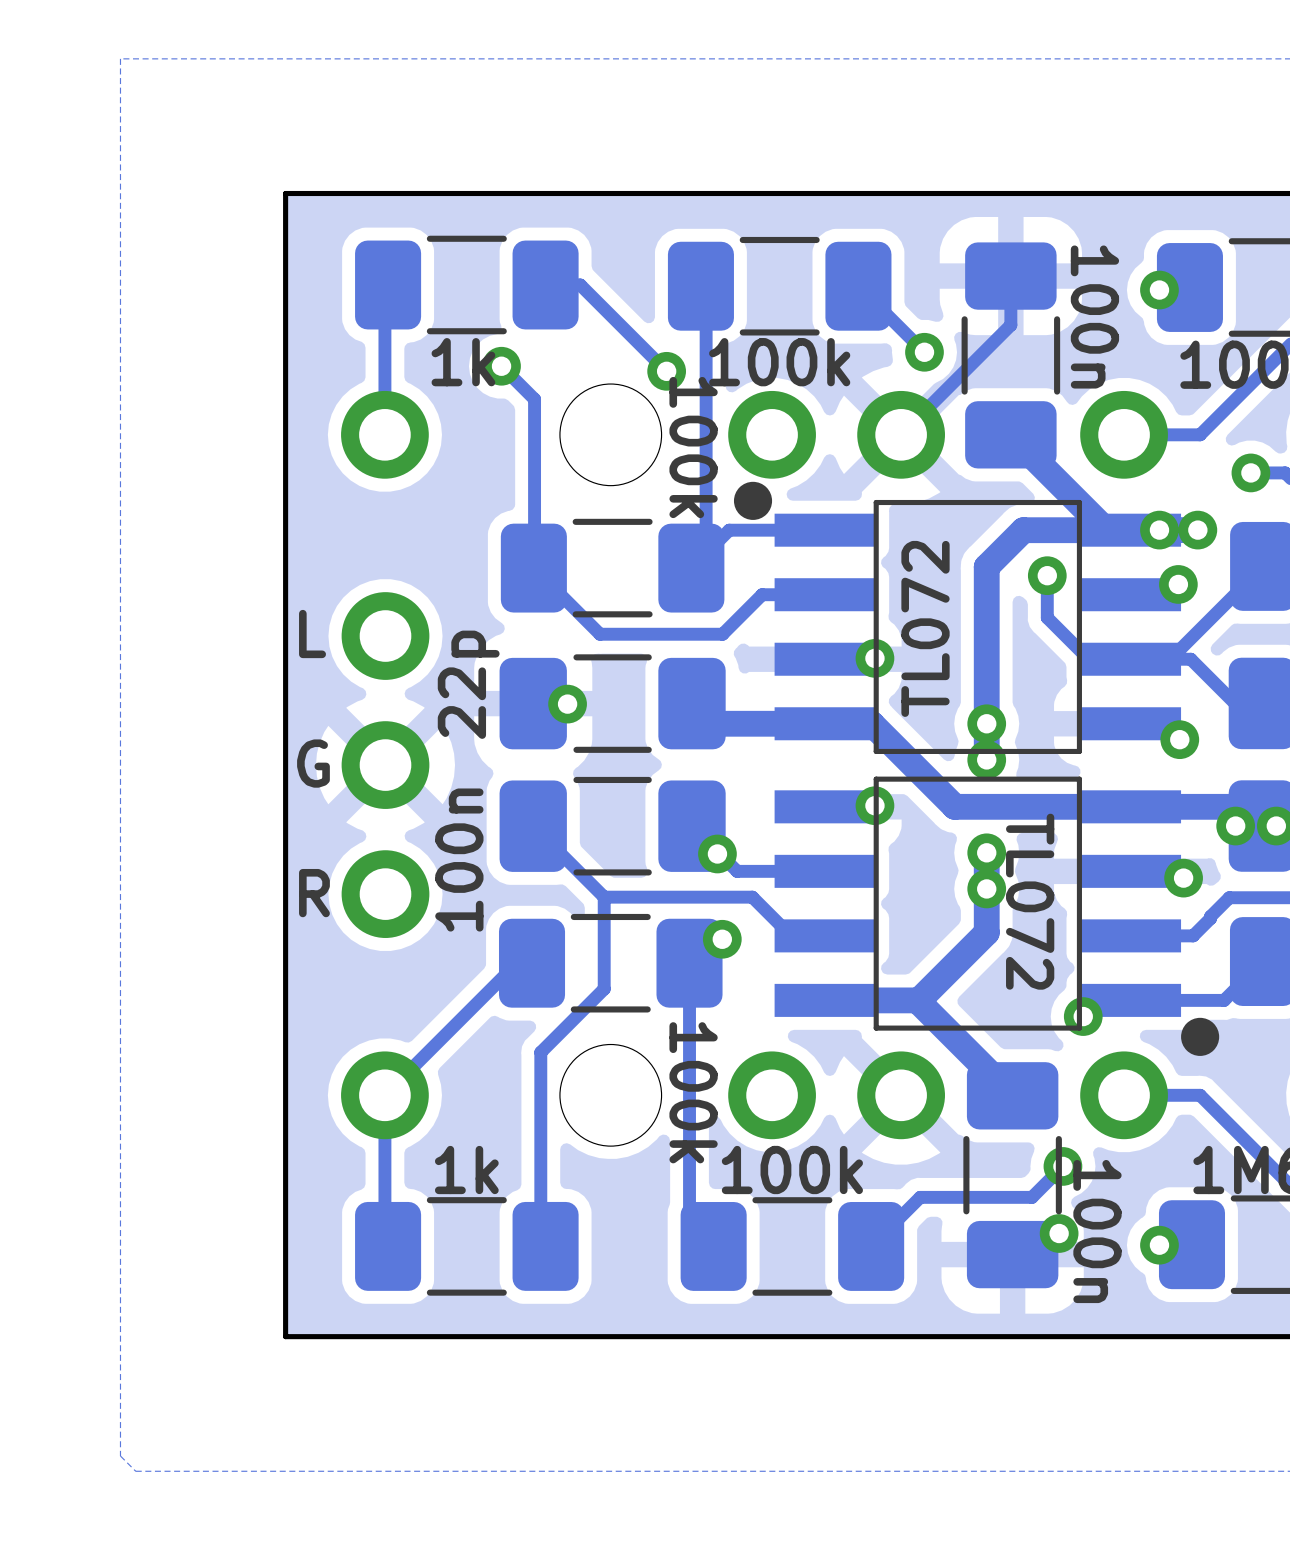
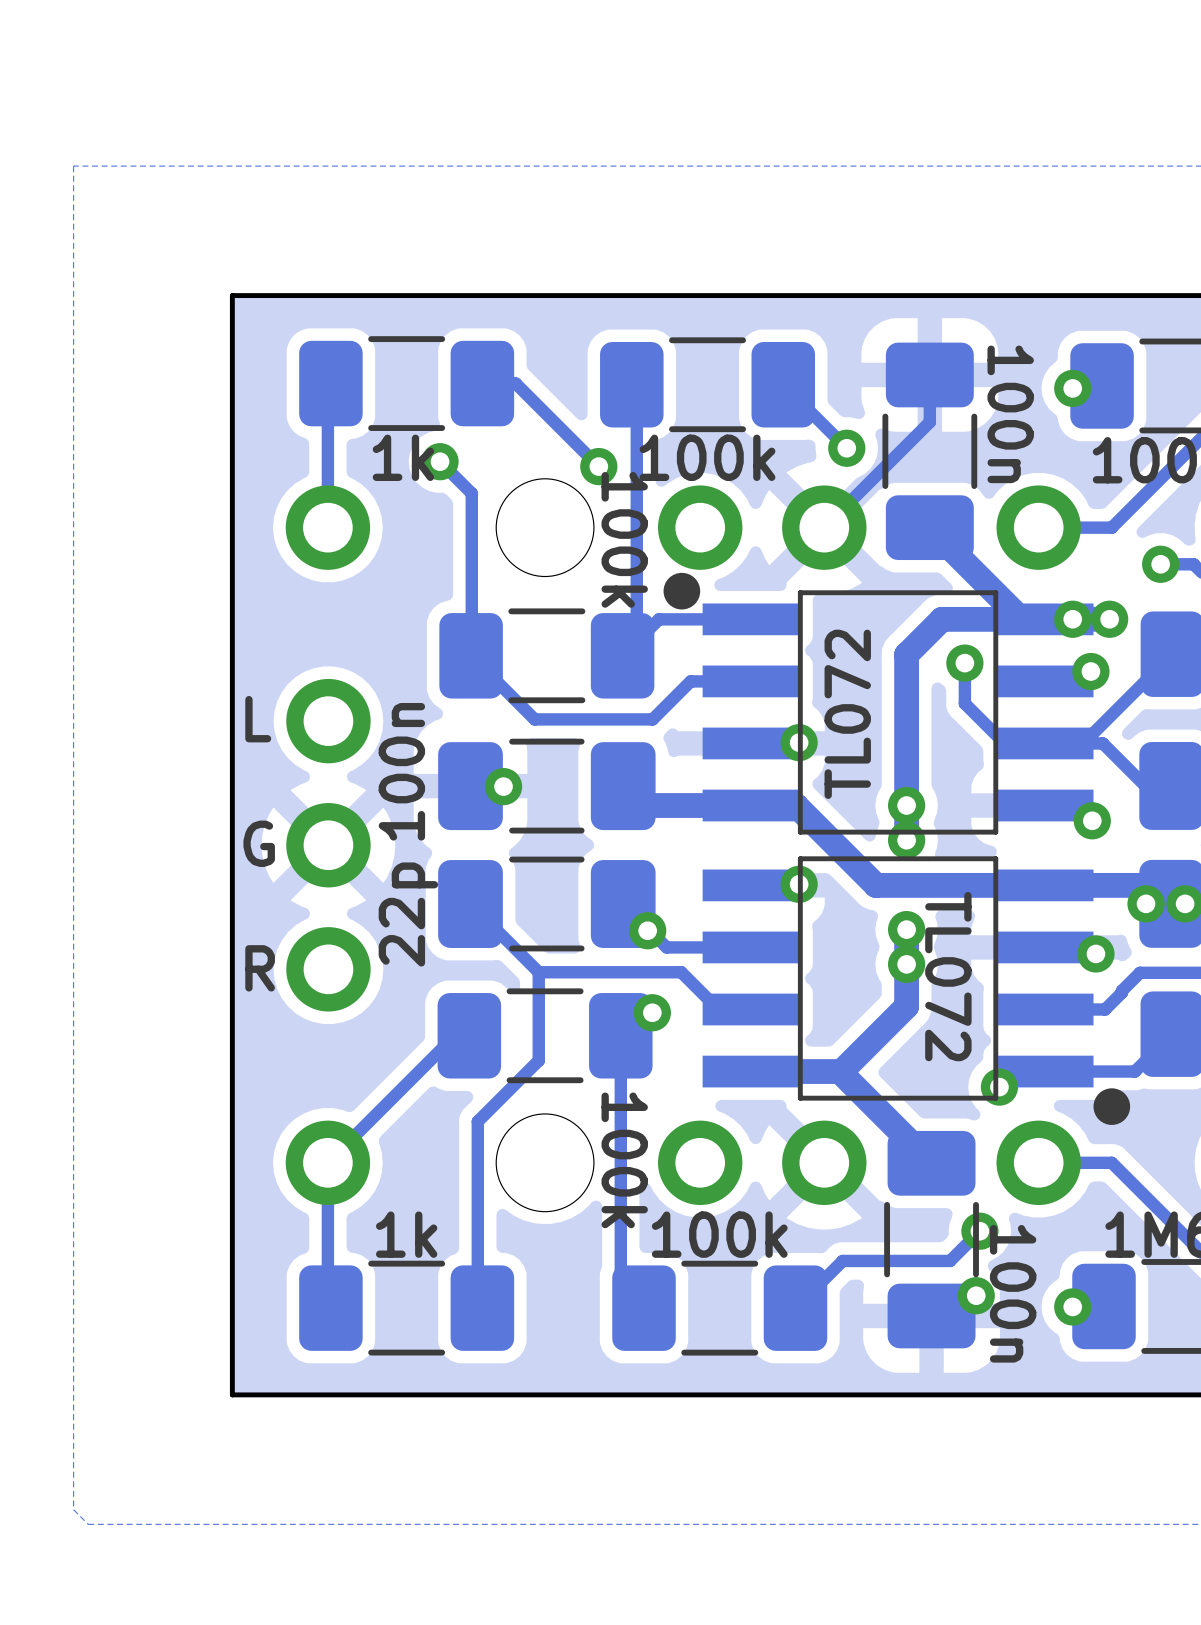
part value position: 22p (468, 684) -> 22p (408, 914)
part value position: 100n (459, 860) -> 100n (401, 771)

